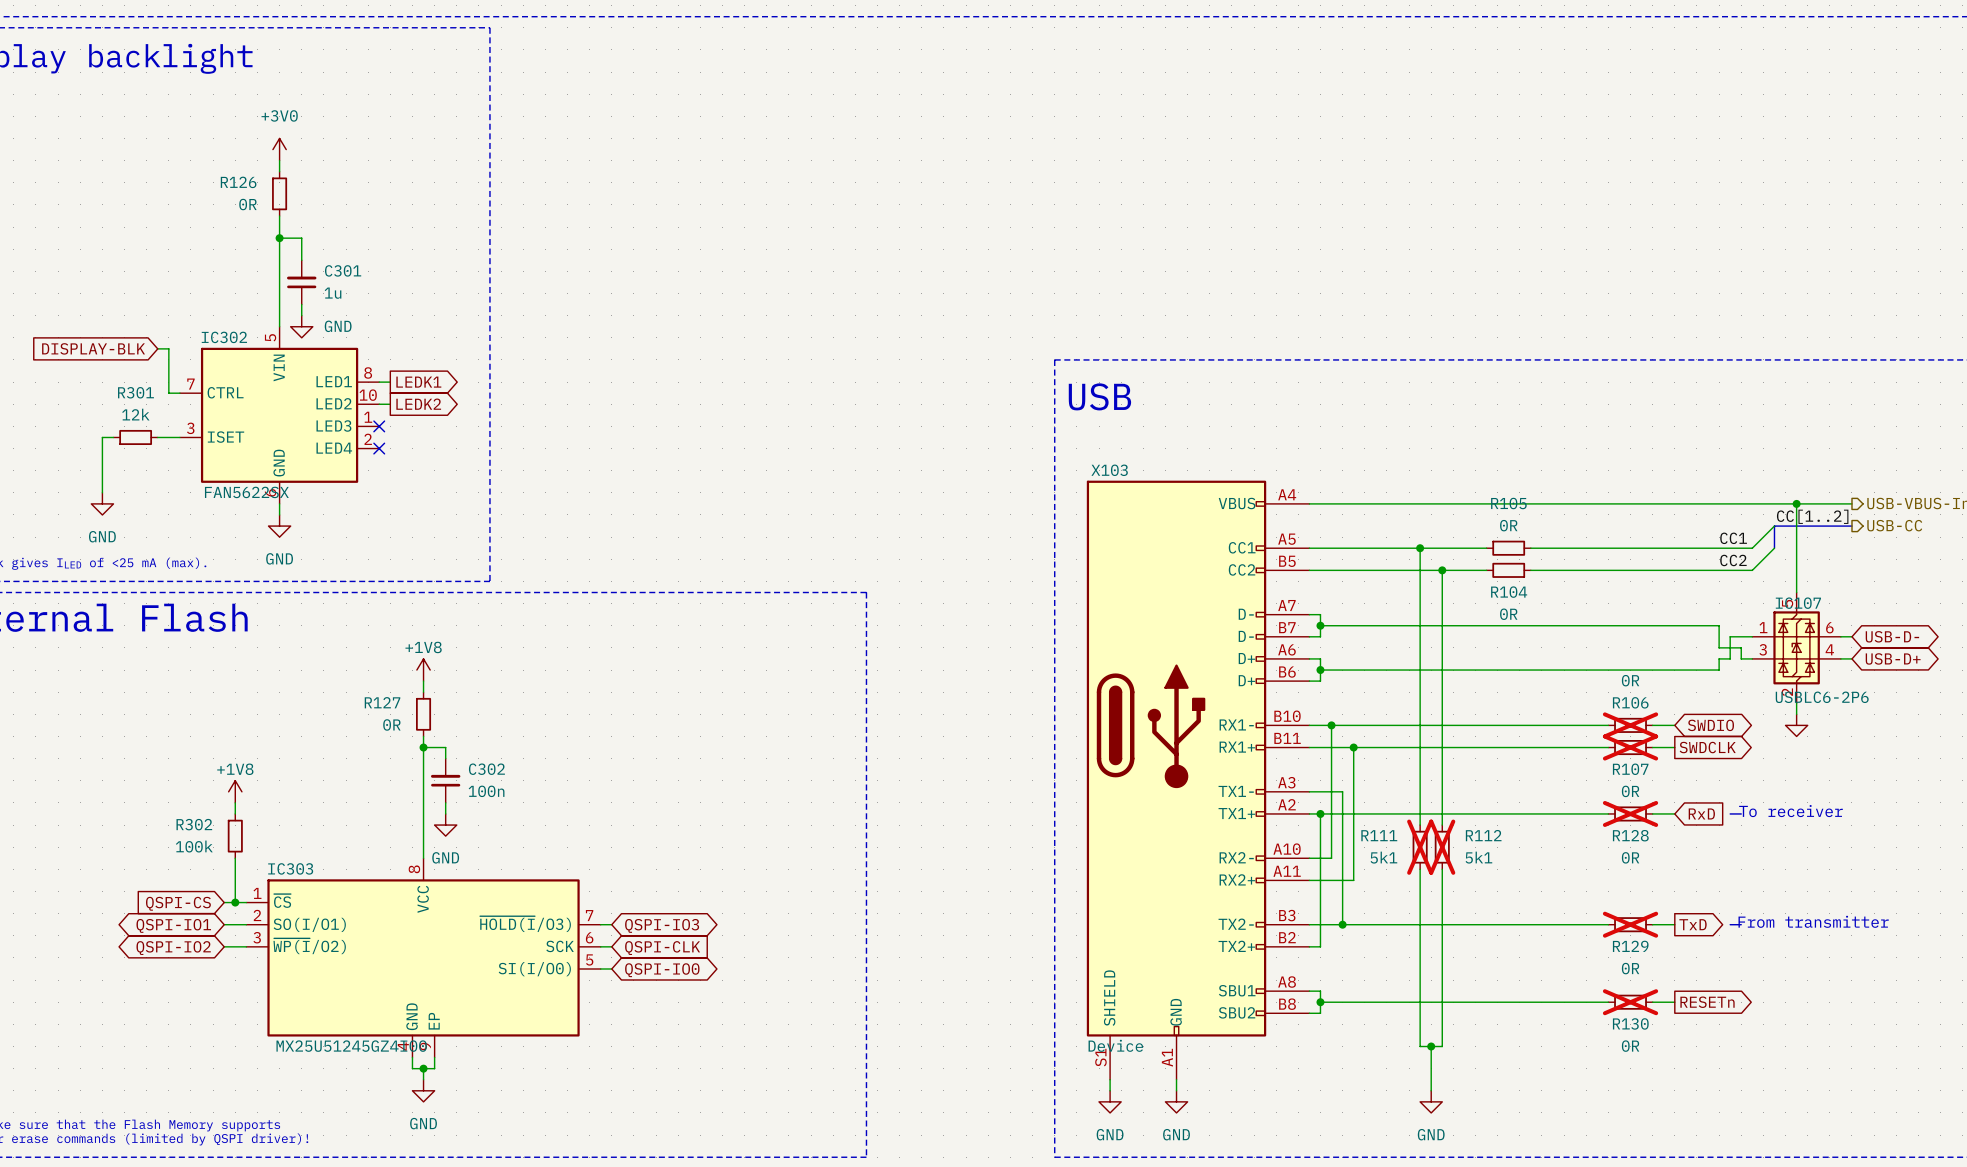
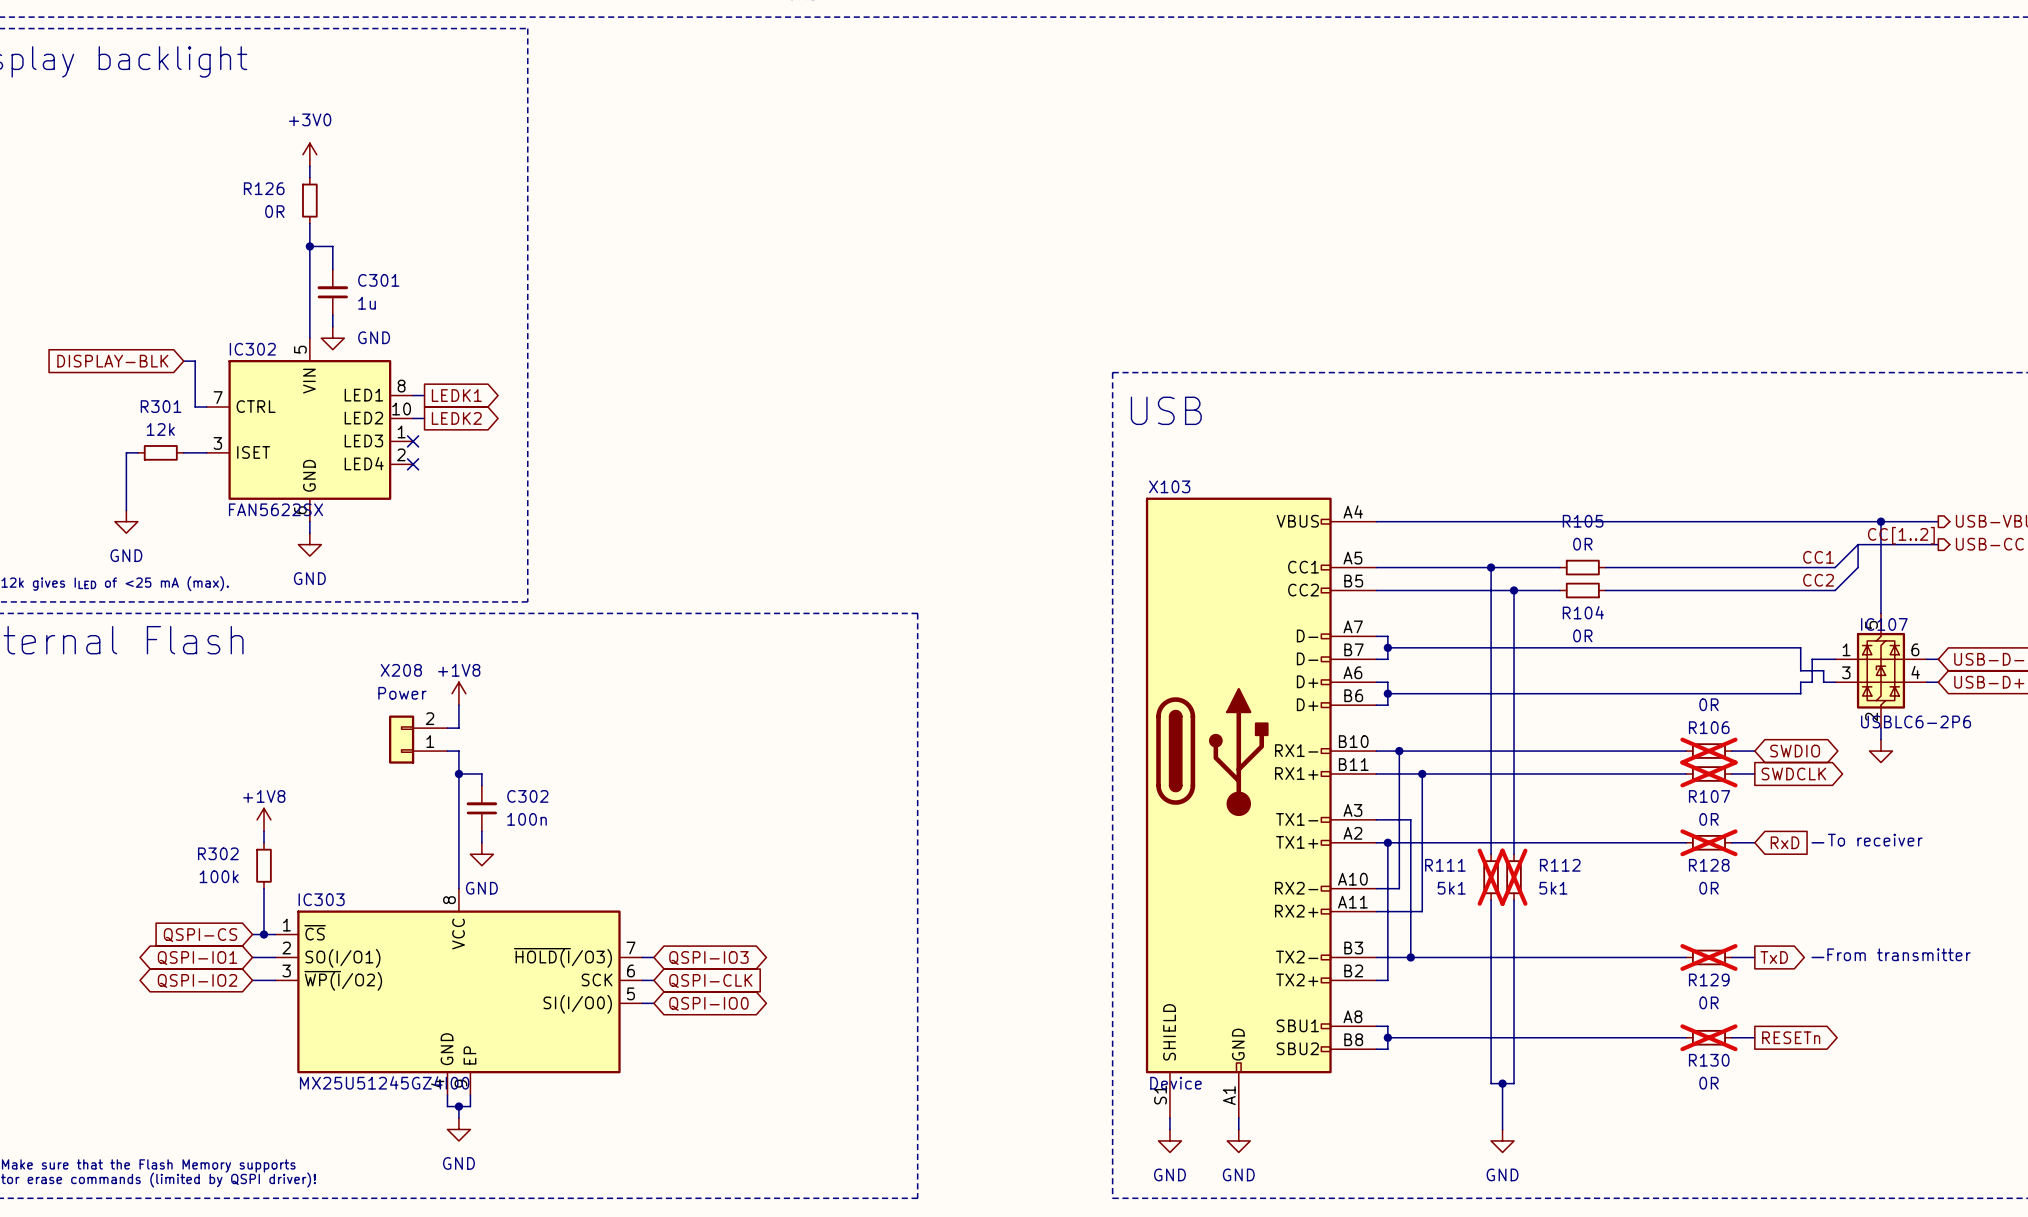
wire: none -> (458, 716) (458, 728) (447, 728)
X208: none -> Power (418, 739)
R127: 0R (423, 714) -> none
wire: none -> (447, 751) (458, 751) (458, 762)

